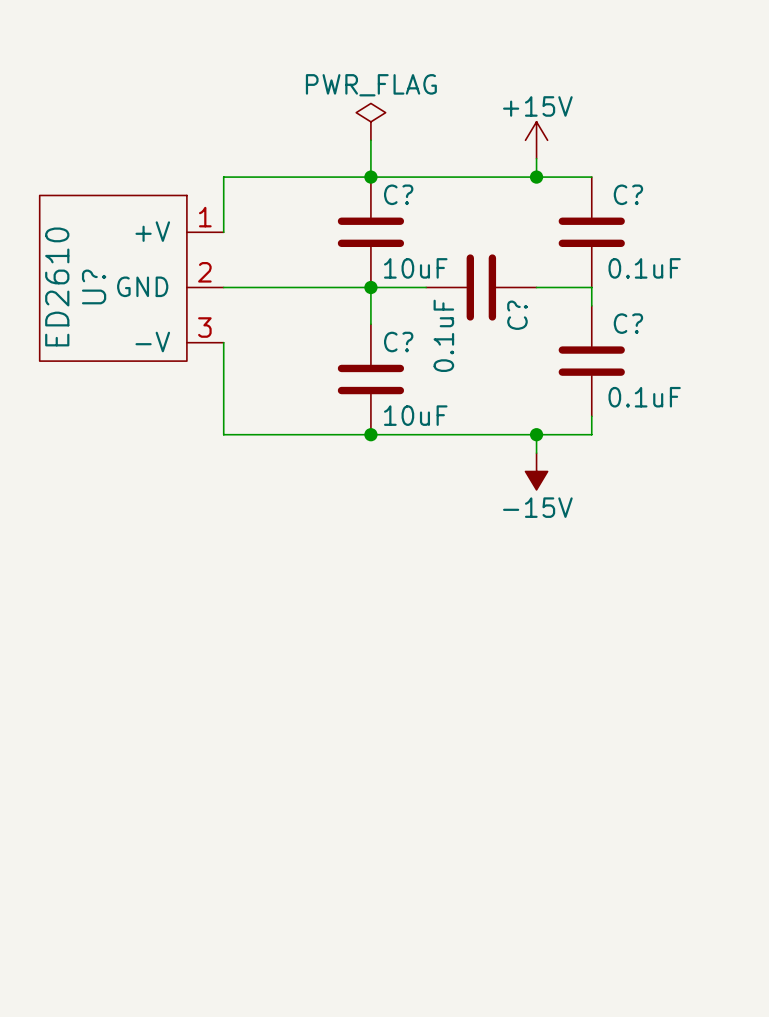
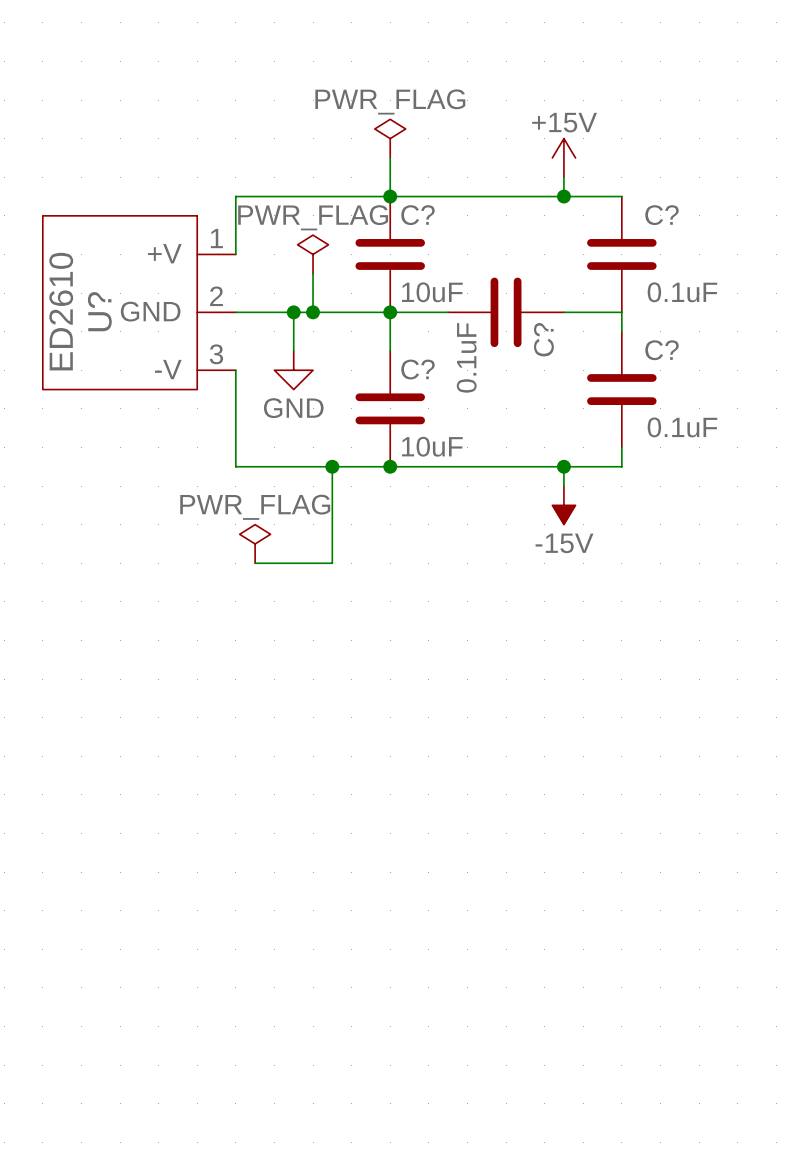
power symbol: none -> PWR_FLAG (313, 254)
wire: none -> (313, 273) (313, 312)
wire: none -> (293, 312) (293, 350)
junction: none -> (293, 312)
junction: none -> (313, 312)
power symbol: none -> GND (293, 370)
wire: none -> (332, 466) (332, 563) (255, 563)
junction: none -> (332, 466)
power symbol: none -> PWR_FLAG (255, 543)

